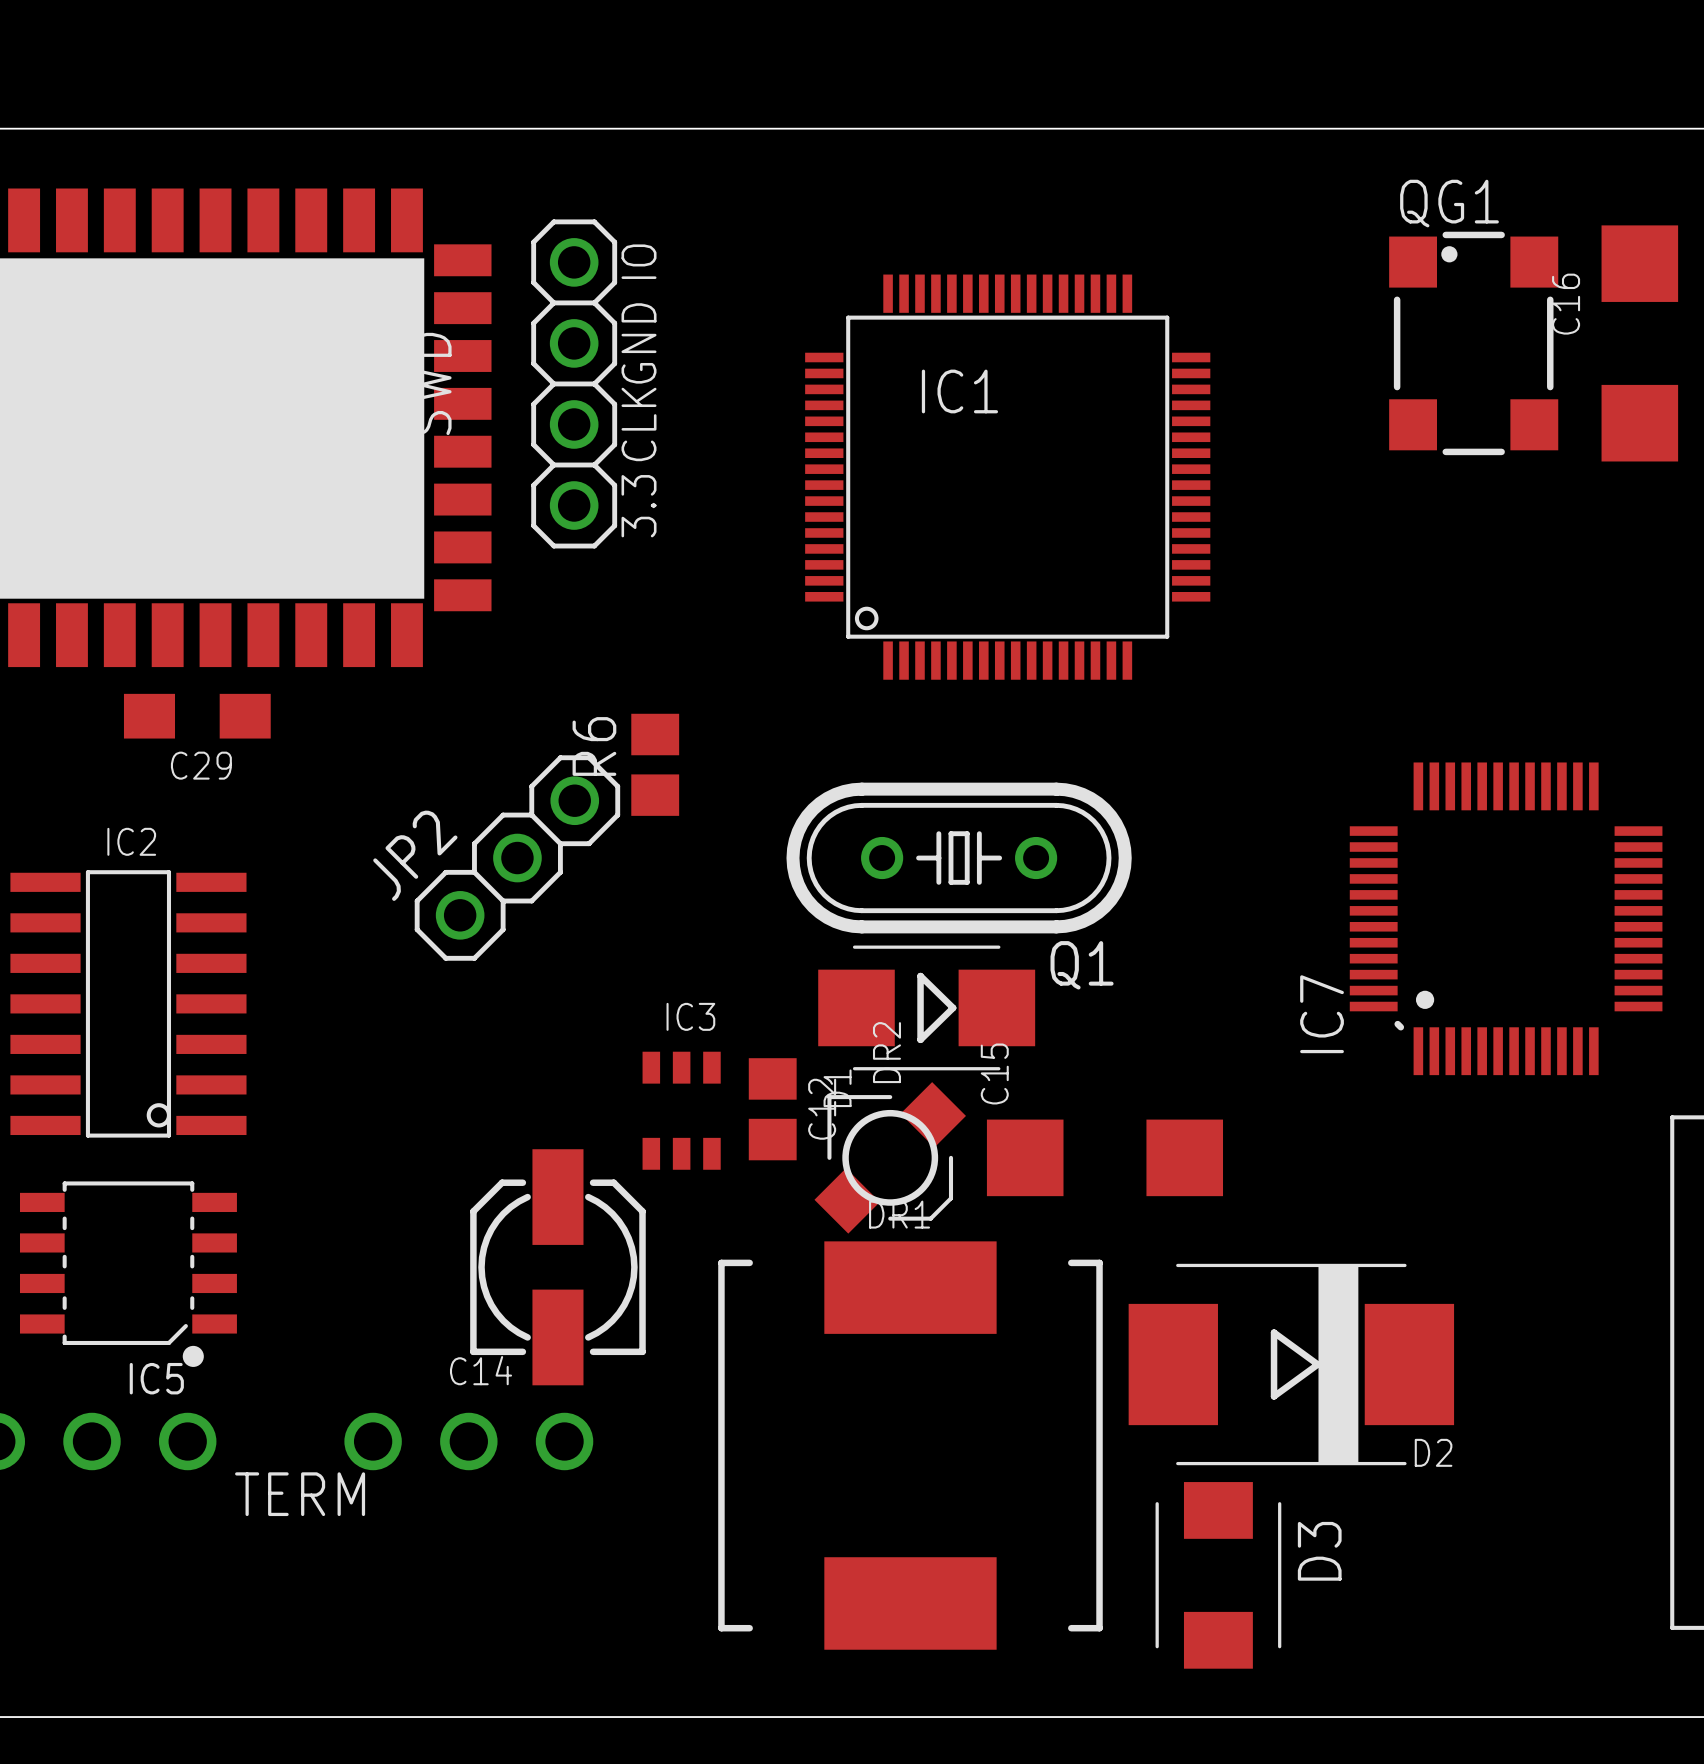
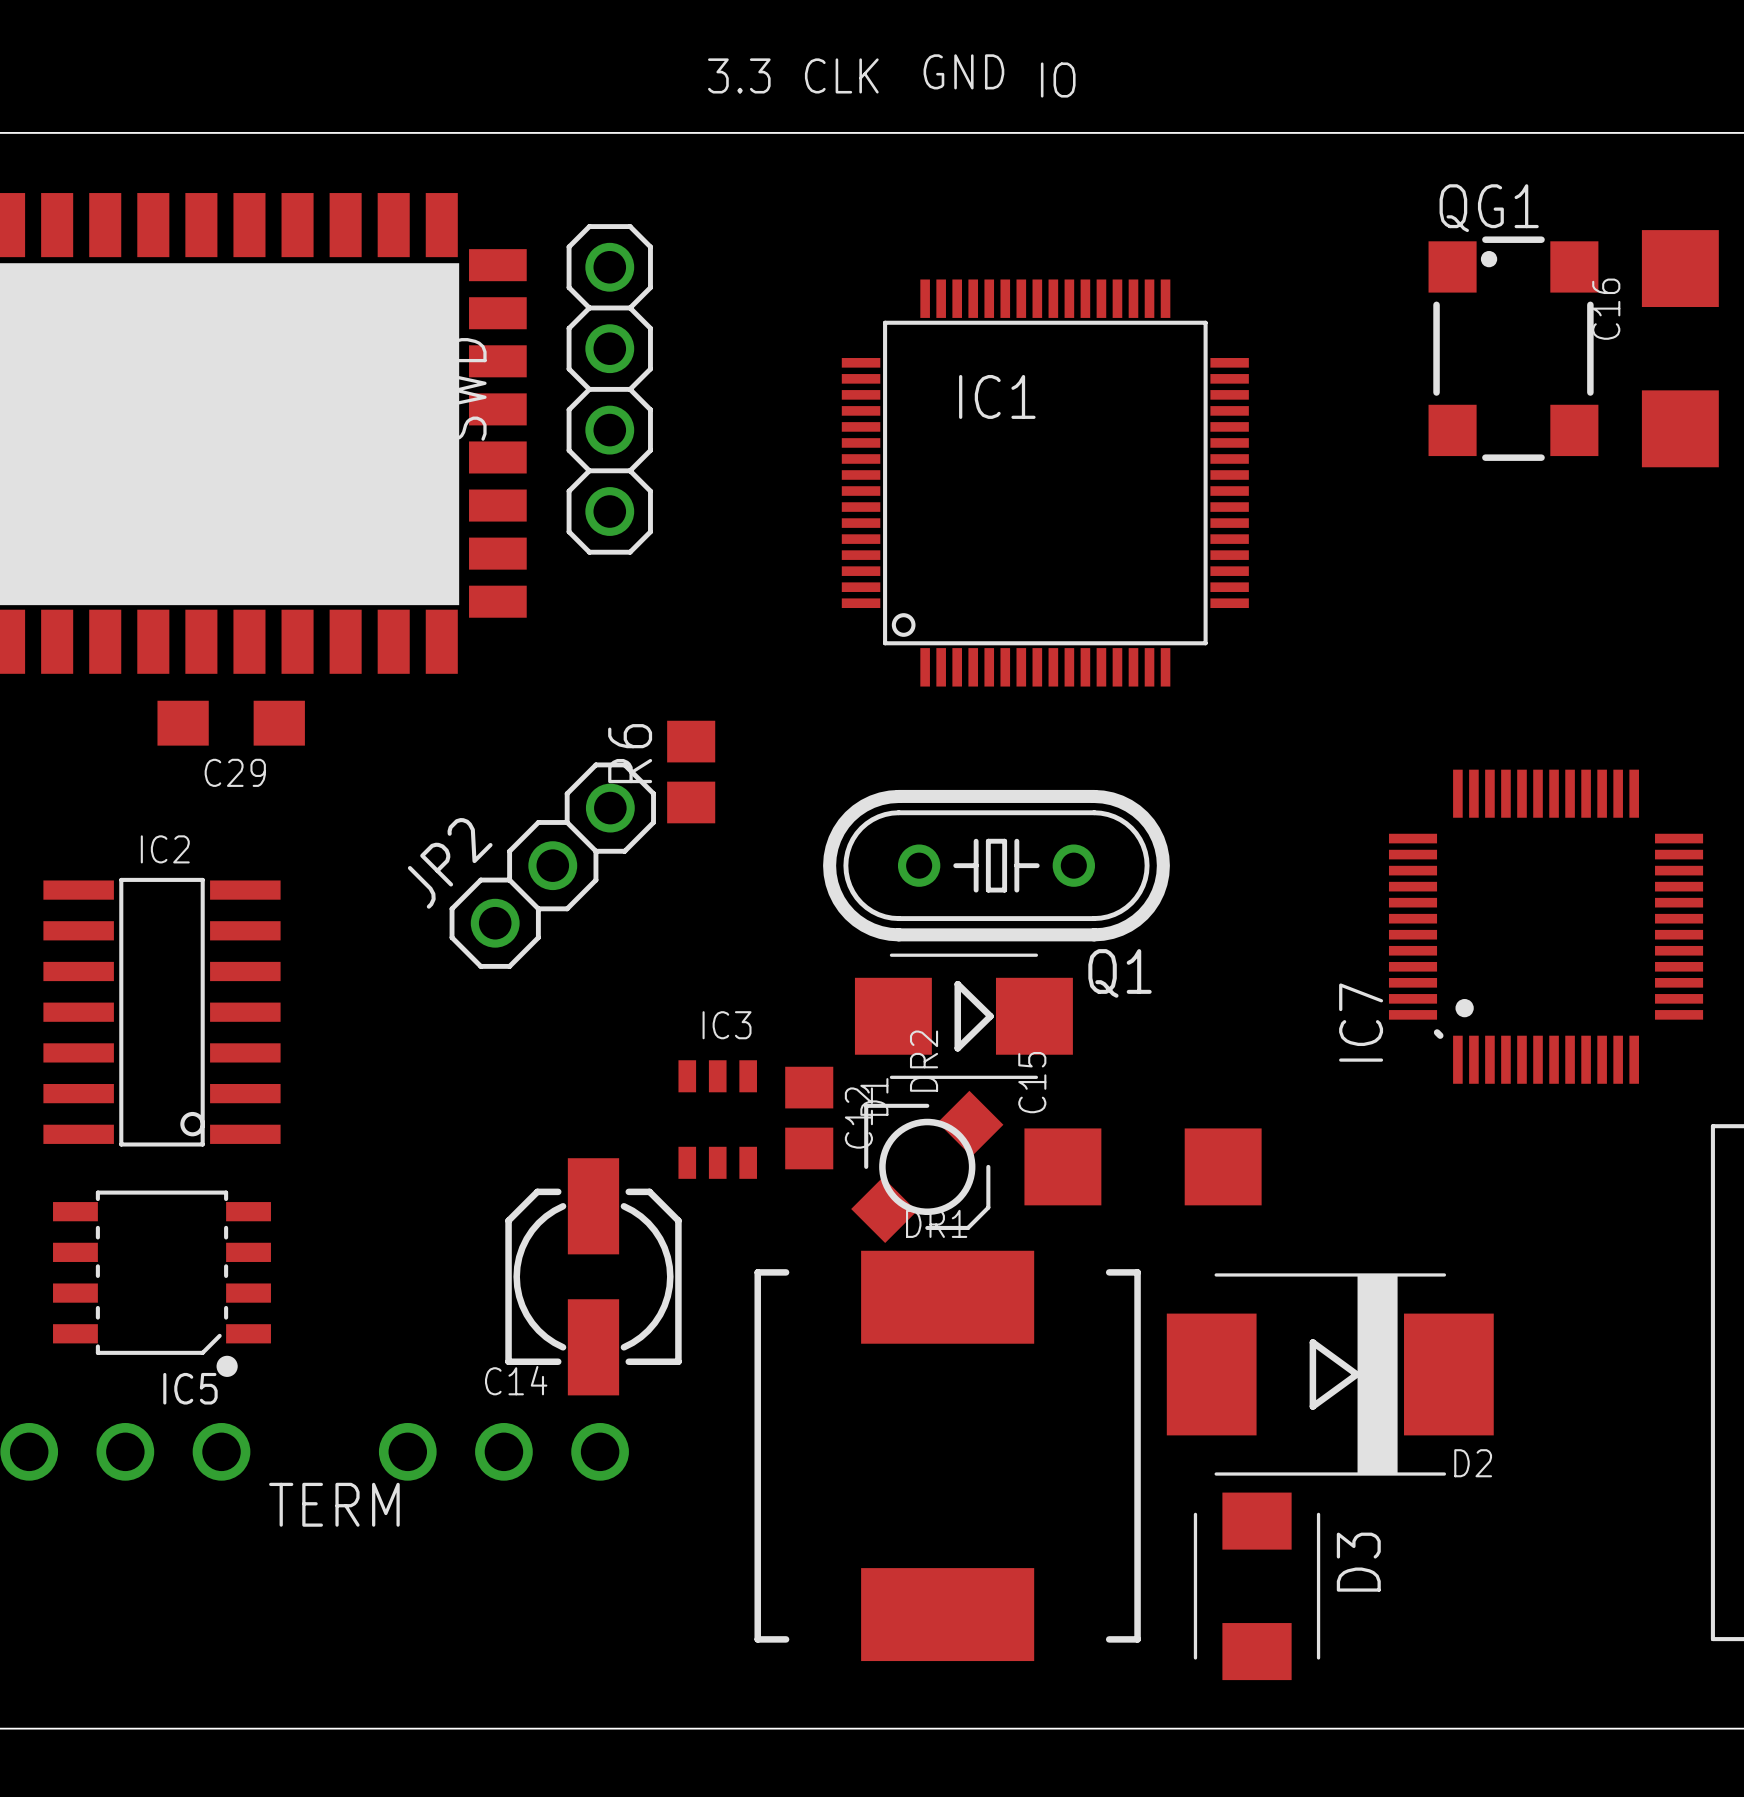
text rotation: 0° (639, 261) -> 90° clockwise (1058, 80)
text position: IO (639, 261) -> IO (1058, 80)
text rotation: 0° (639, 343) -> 90° clockwise (963, 71)
text position: GND (639, 343) -> GND (963, 71)
text rotation: 0° (639, 424) -> 90° clockwise (841, 75)
text position: CLK (639, 424) -> CLK (841, 75)
text rotation: 0° (639, 506) -> 90° clockwise (739, 75)
text position: 3.3 (639, 506) -> 3.3 (739, 75)

